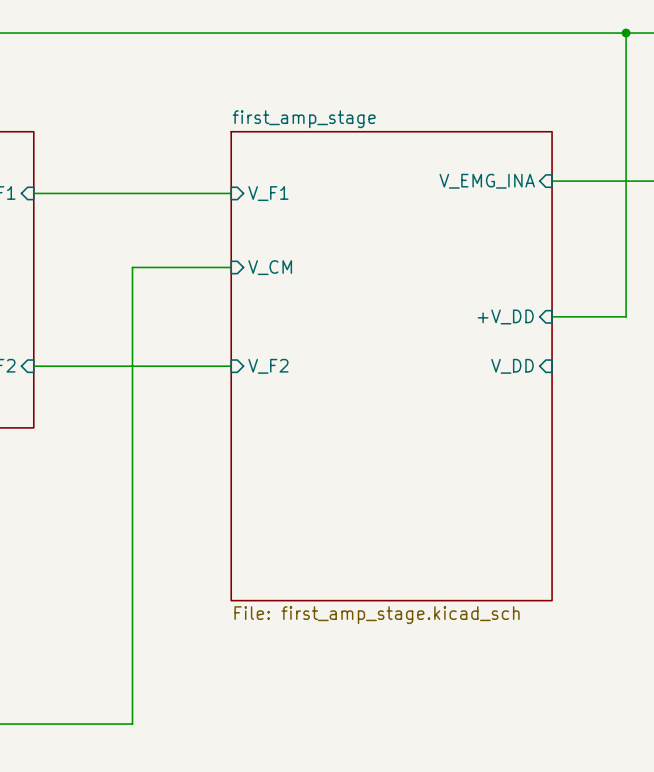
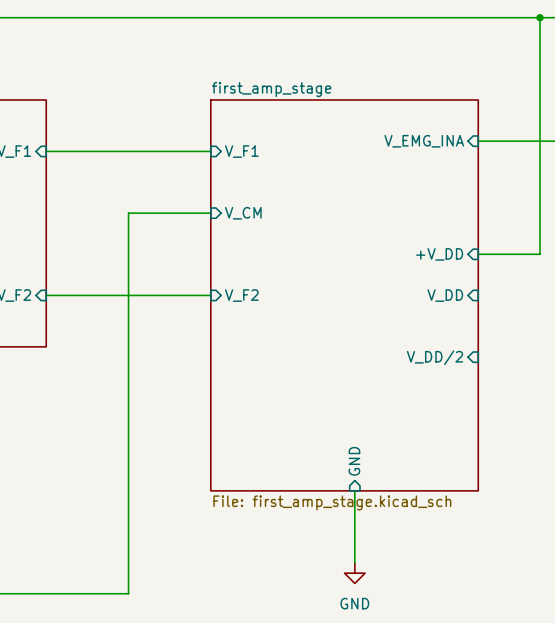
sheet pin: none -> V_DD/2 (435, 357)
sheet pin: none -> GND (354, 461)
wire: none -> (354, 490) (354, 562)
power symbol: none -> GND (354, 573)

